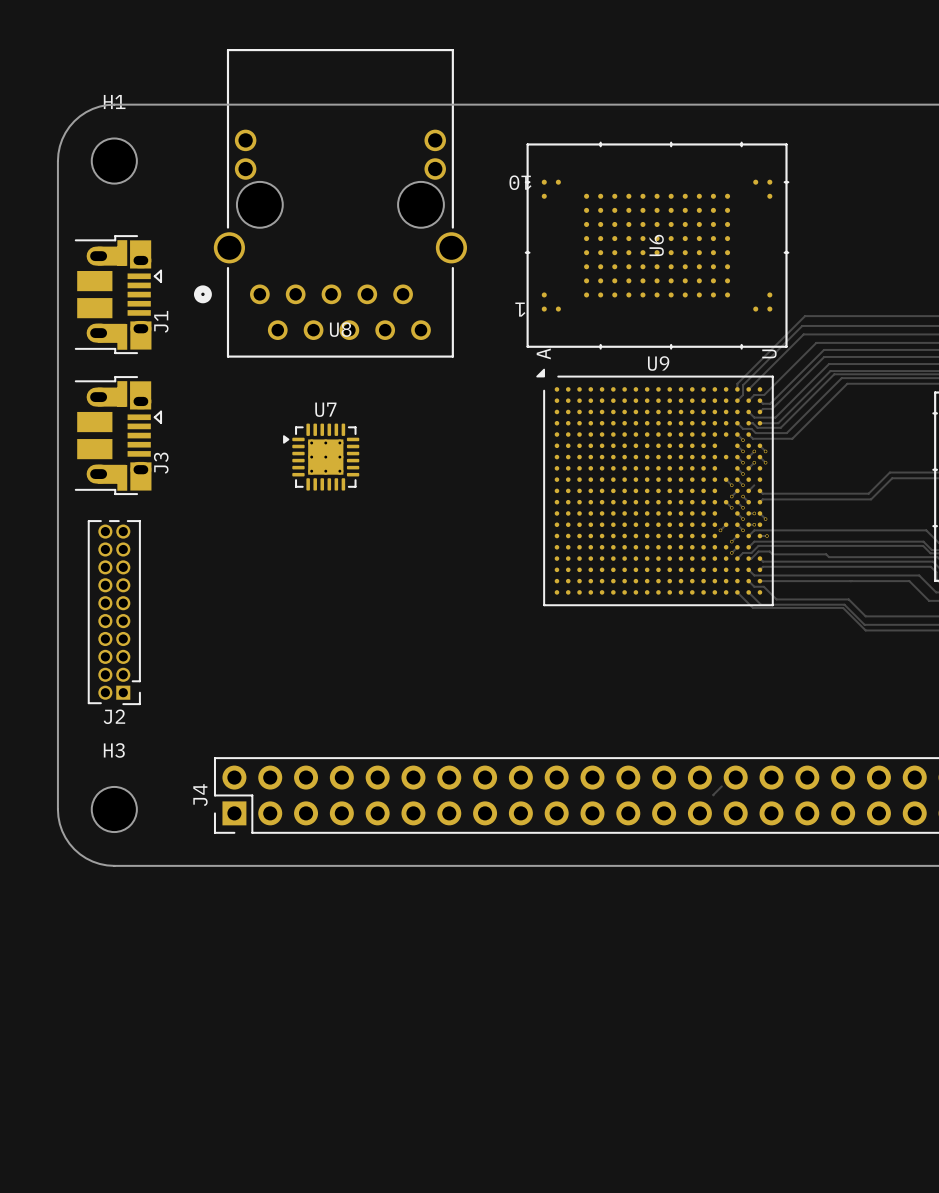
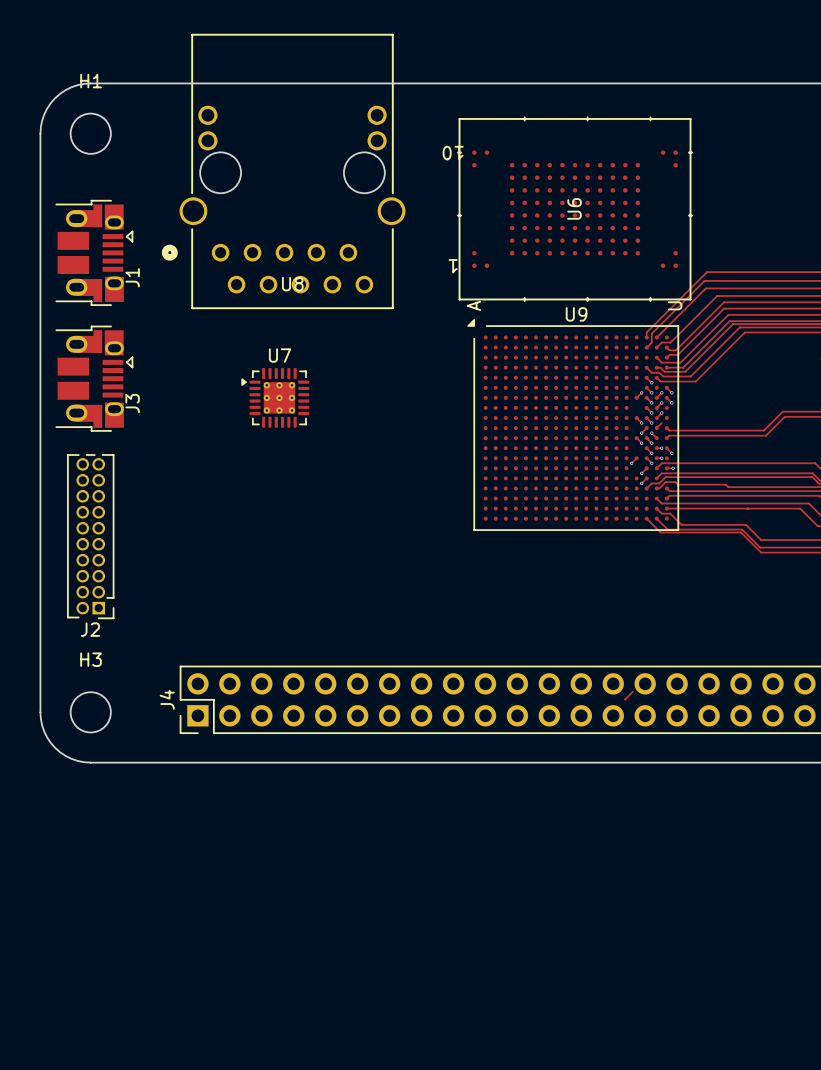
track: none -> (641, 392) (636, 397)
via: none -> (641, 392)
track: none -> (661, 412) (656, 418)
via: none -> (661, 412)

